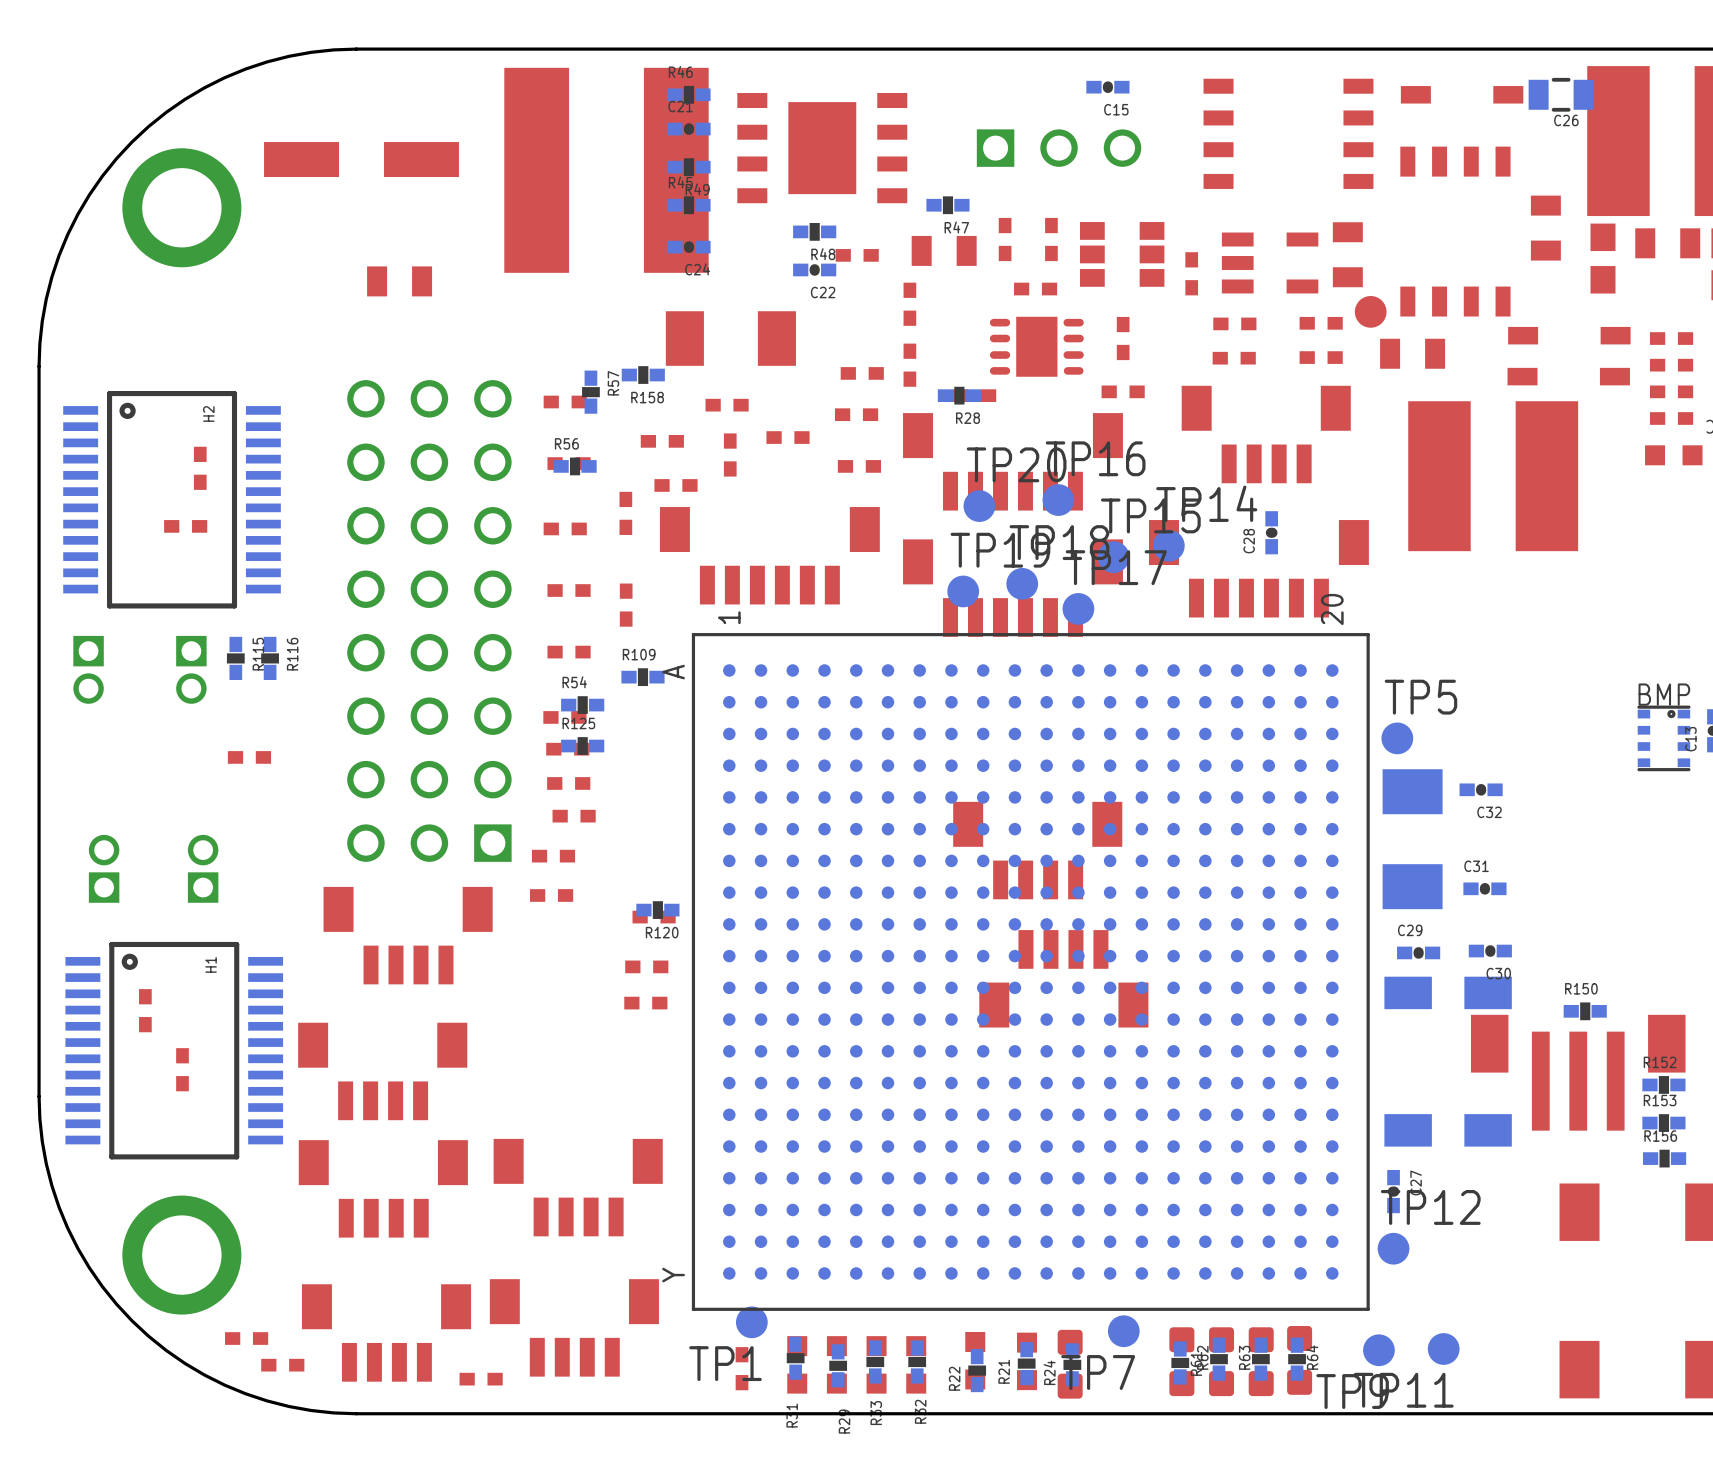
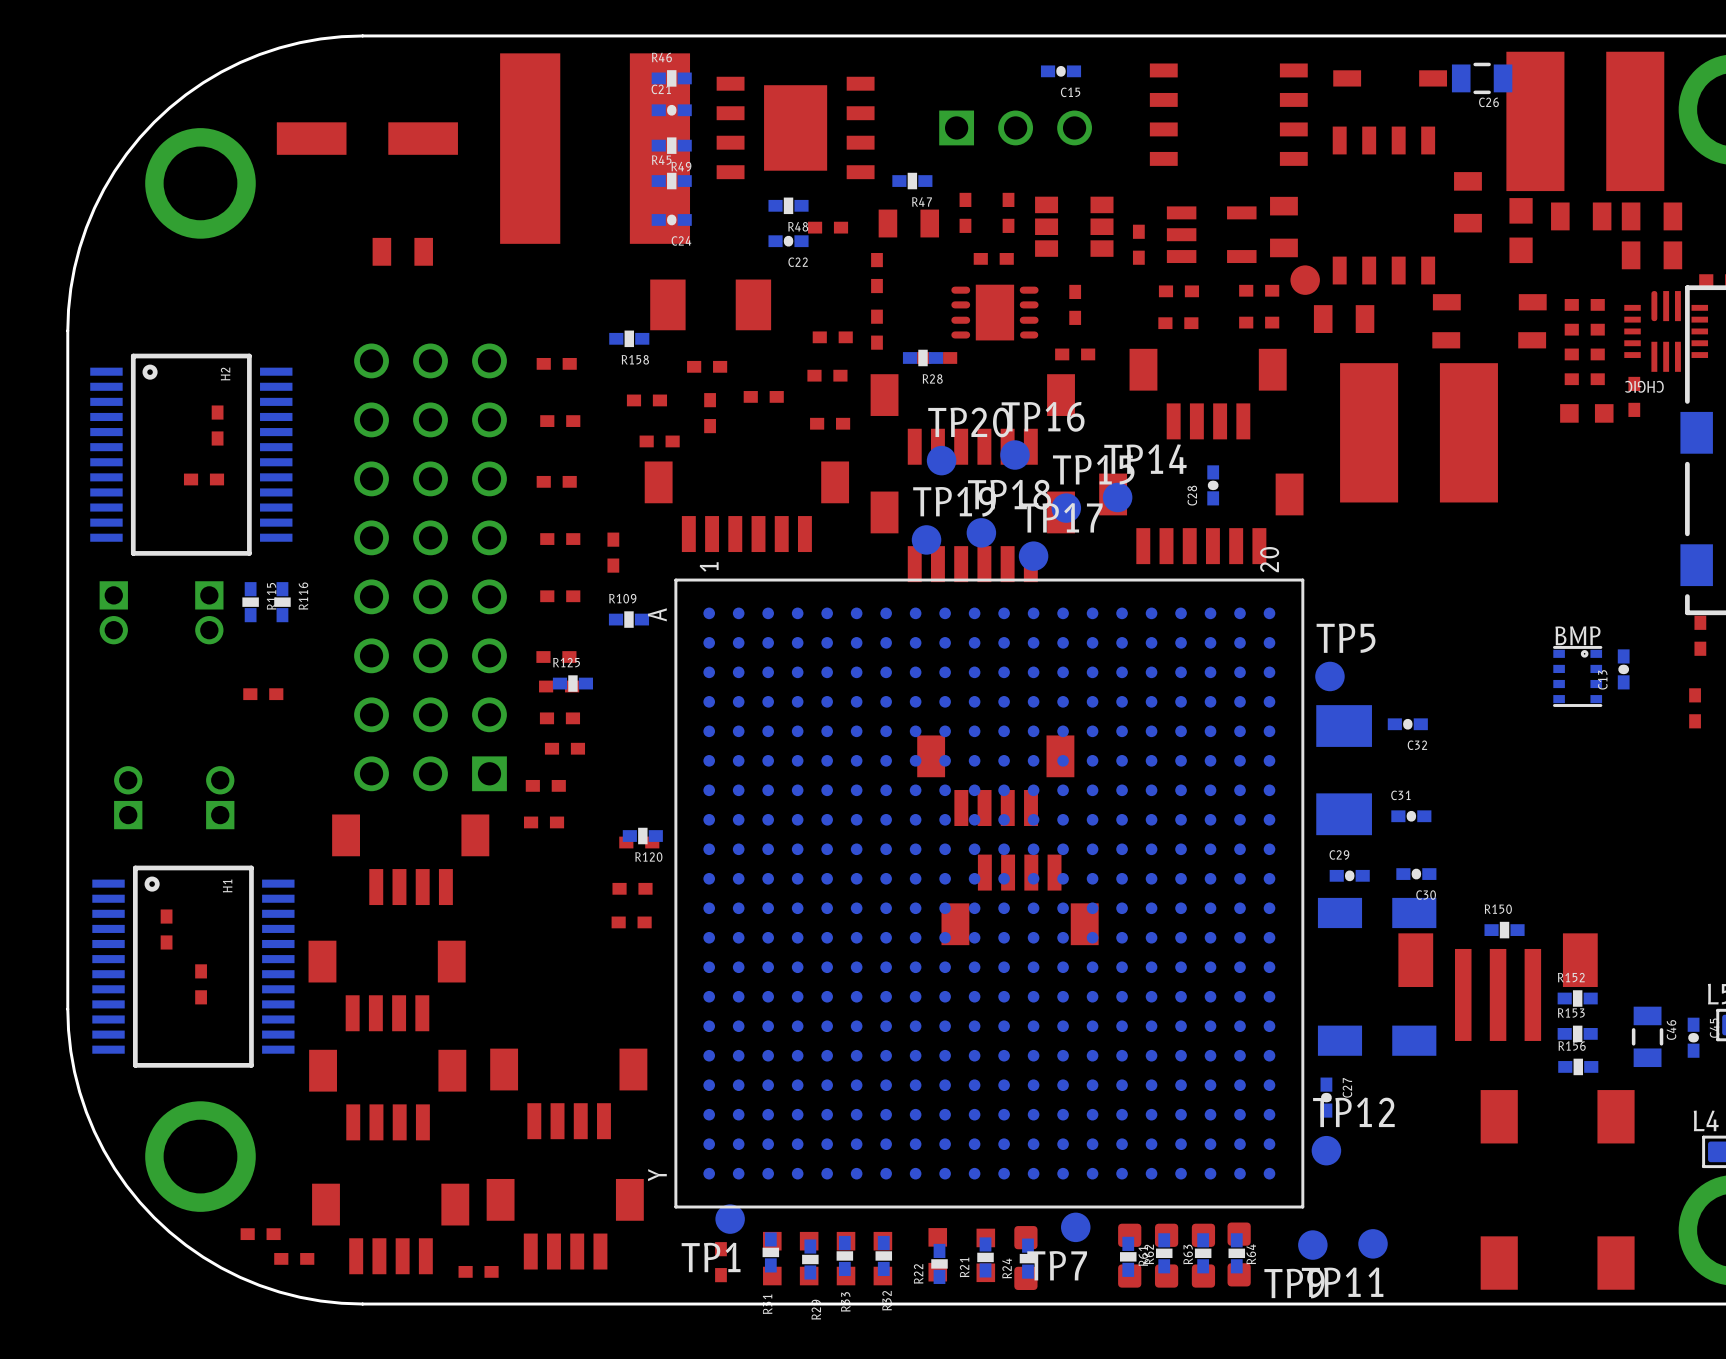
R57: (590, 392) -> none
R56: (575, 466) -> none
part: (625, 513) -> none
R54: (582, 705) -> none

